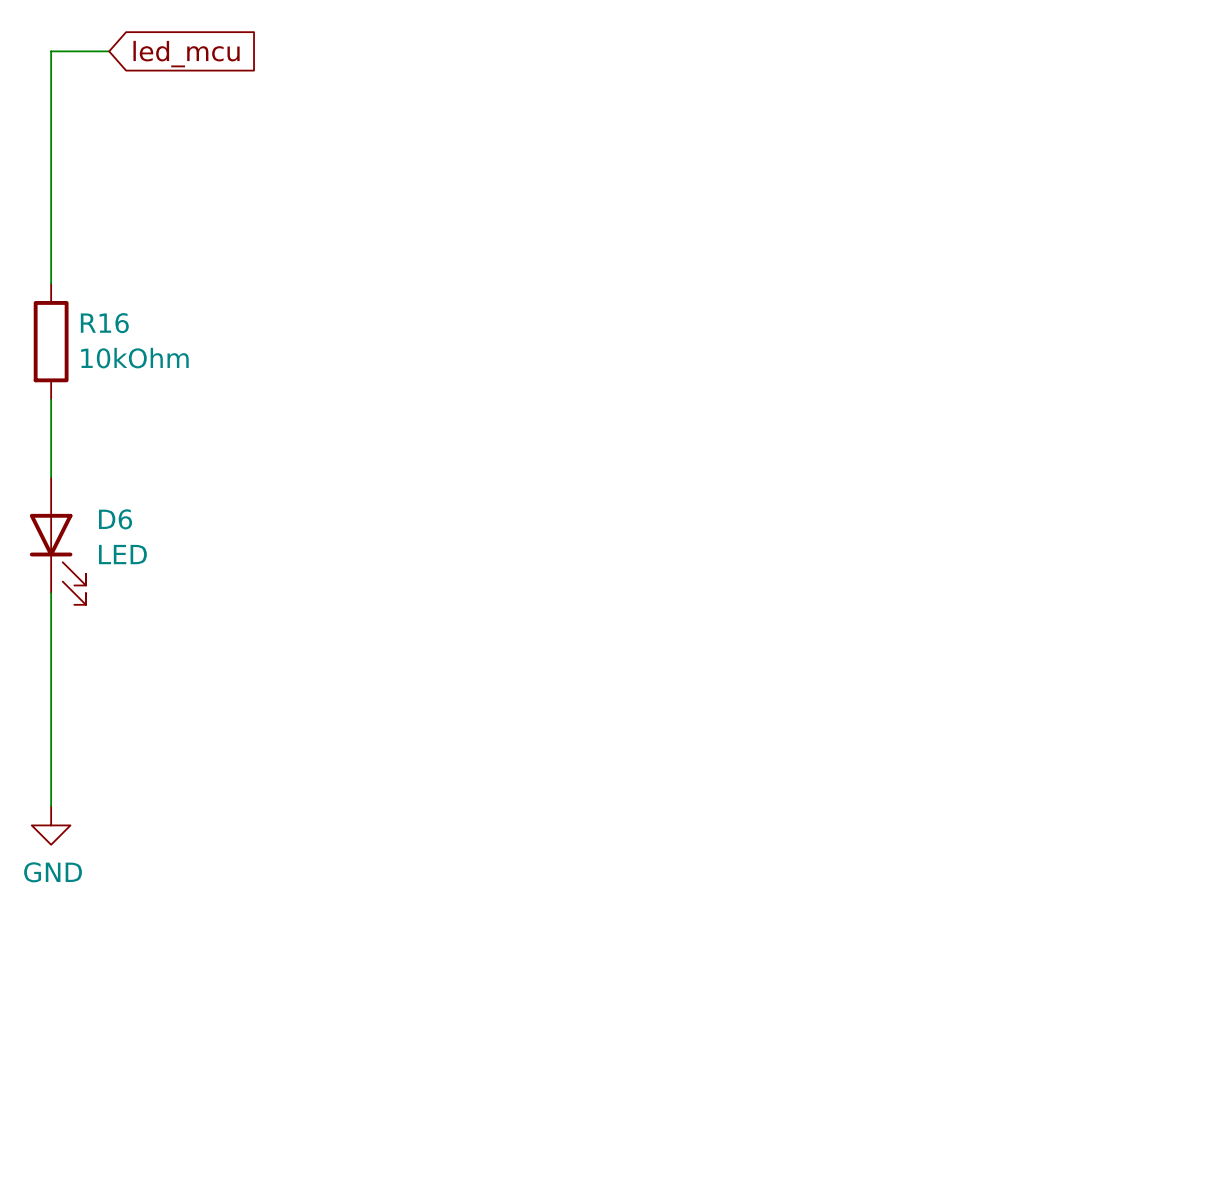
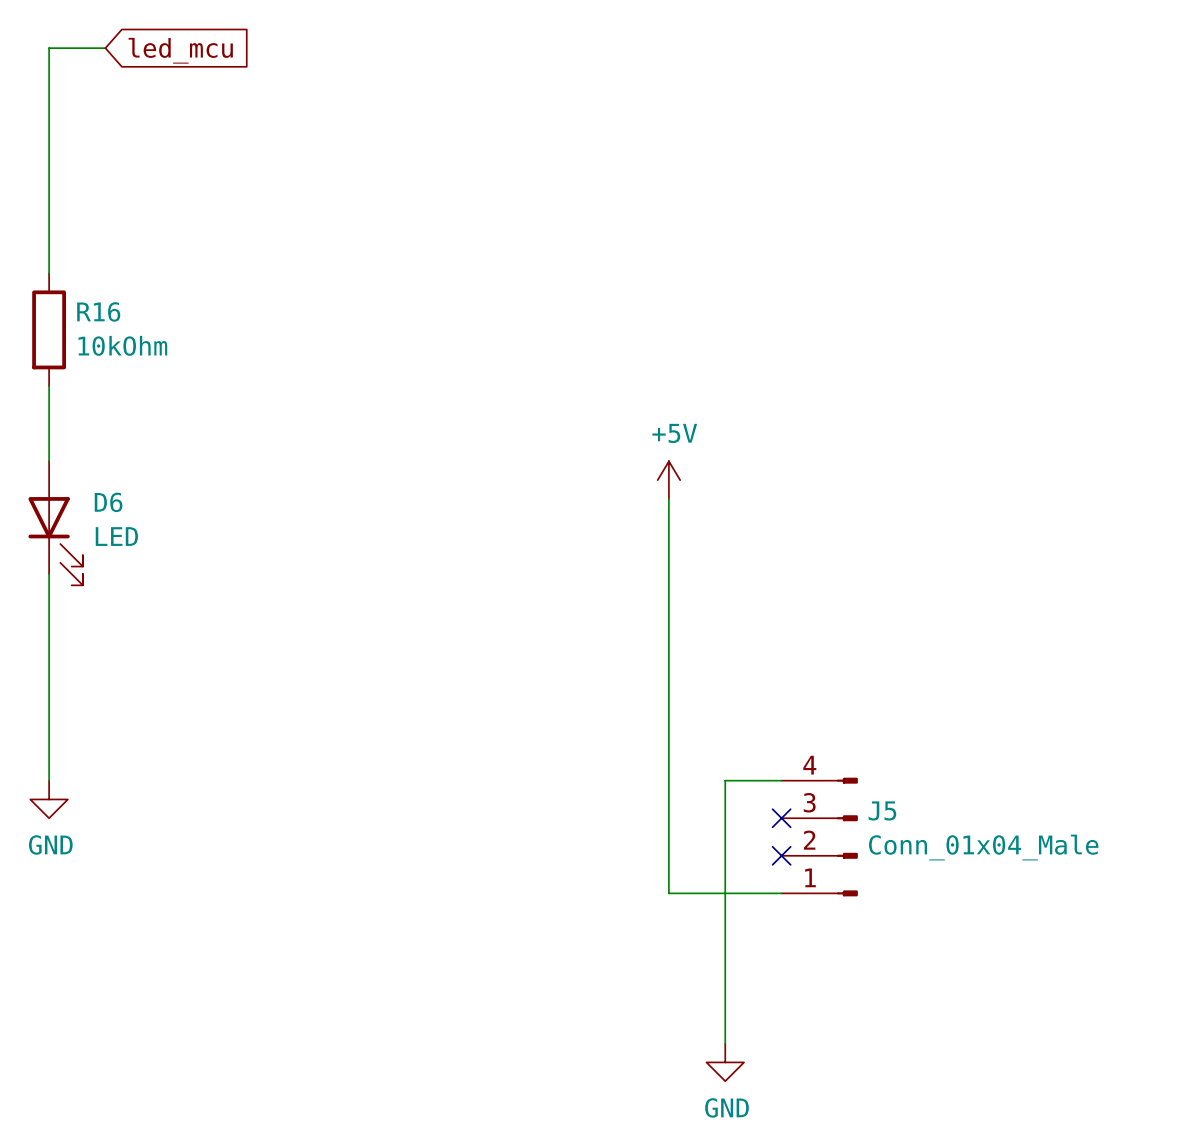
power symbol: none -> +5V (668, 480)
wire: none -> (668, 498) (668, 893) (781, 893)
wire: none -> (781, 780) (725, 780) (725, 1043)
no-connect mark: none -> (781, 818)
J5: none -> Conn_01x04_Male (819, 837)
no-connect mark: none -> (781, 855)
power symbol: none -> GND (725, 1062)

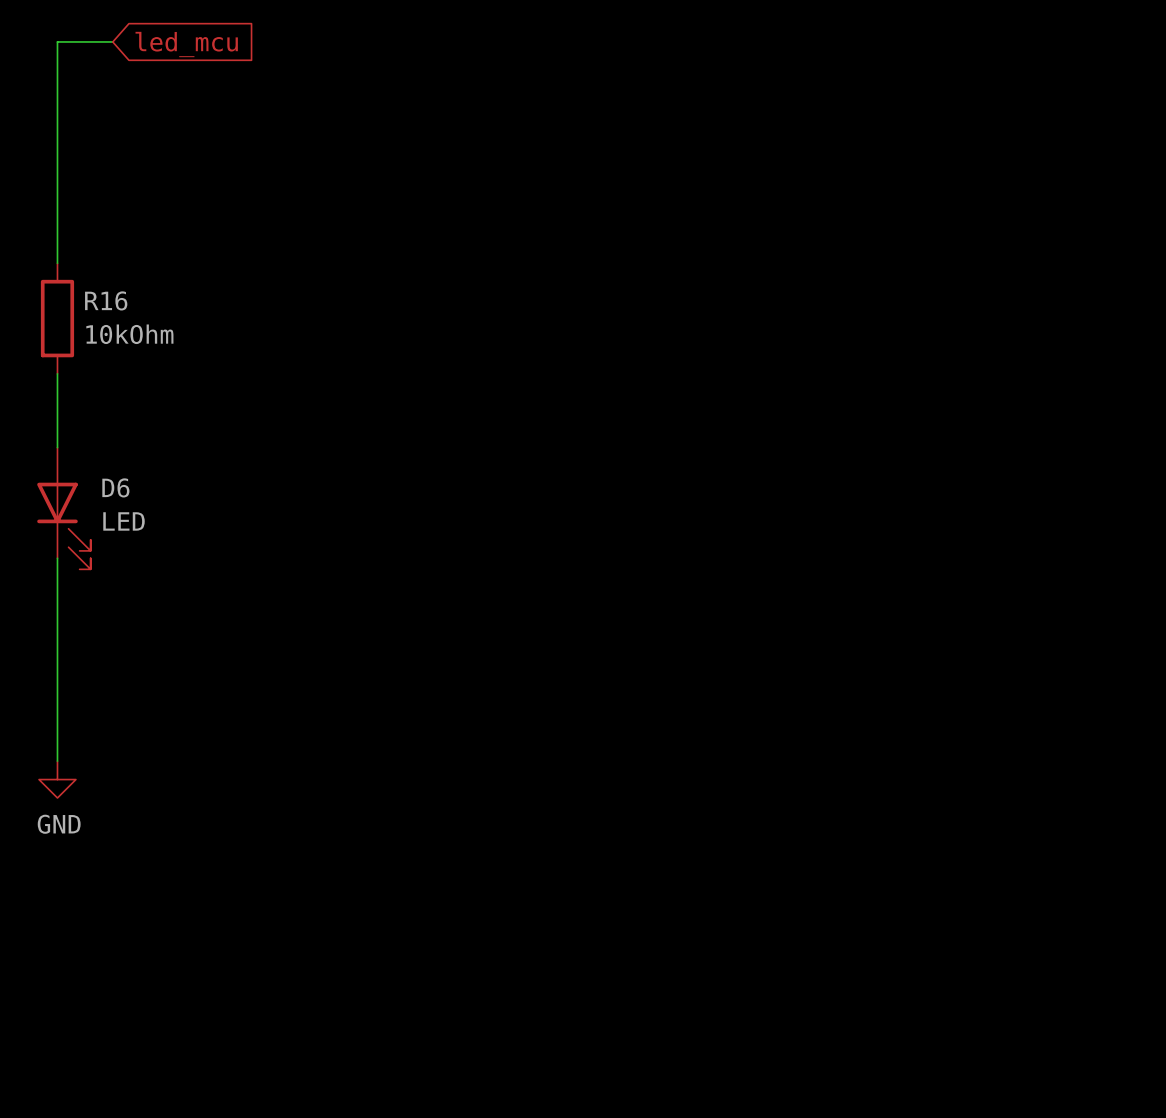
power symbol: +5V (668, 480) -> none
wire: (668, 498) (668, 893) (781, 893) -> none
wire: (781, 780) (725, 780) (725, 1043) -> none
no-connect mark: (781, 818) -> none
J5: Conn_01x04_Male (819, 837) -> none
no-connect mark: (781, 855) -> none
power symbol: GND (725, 1062) -> none

